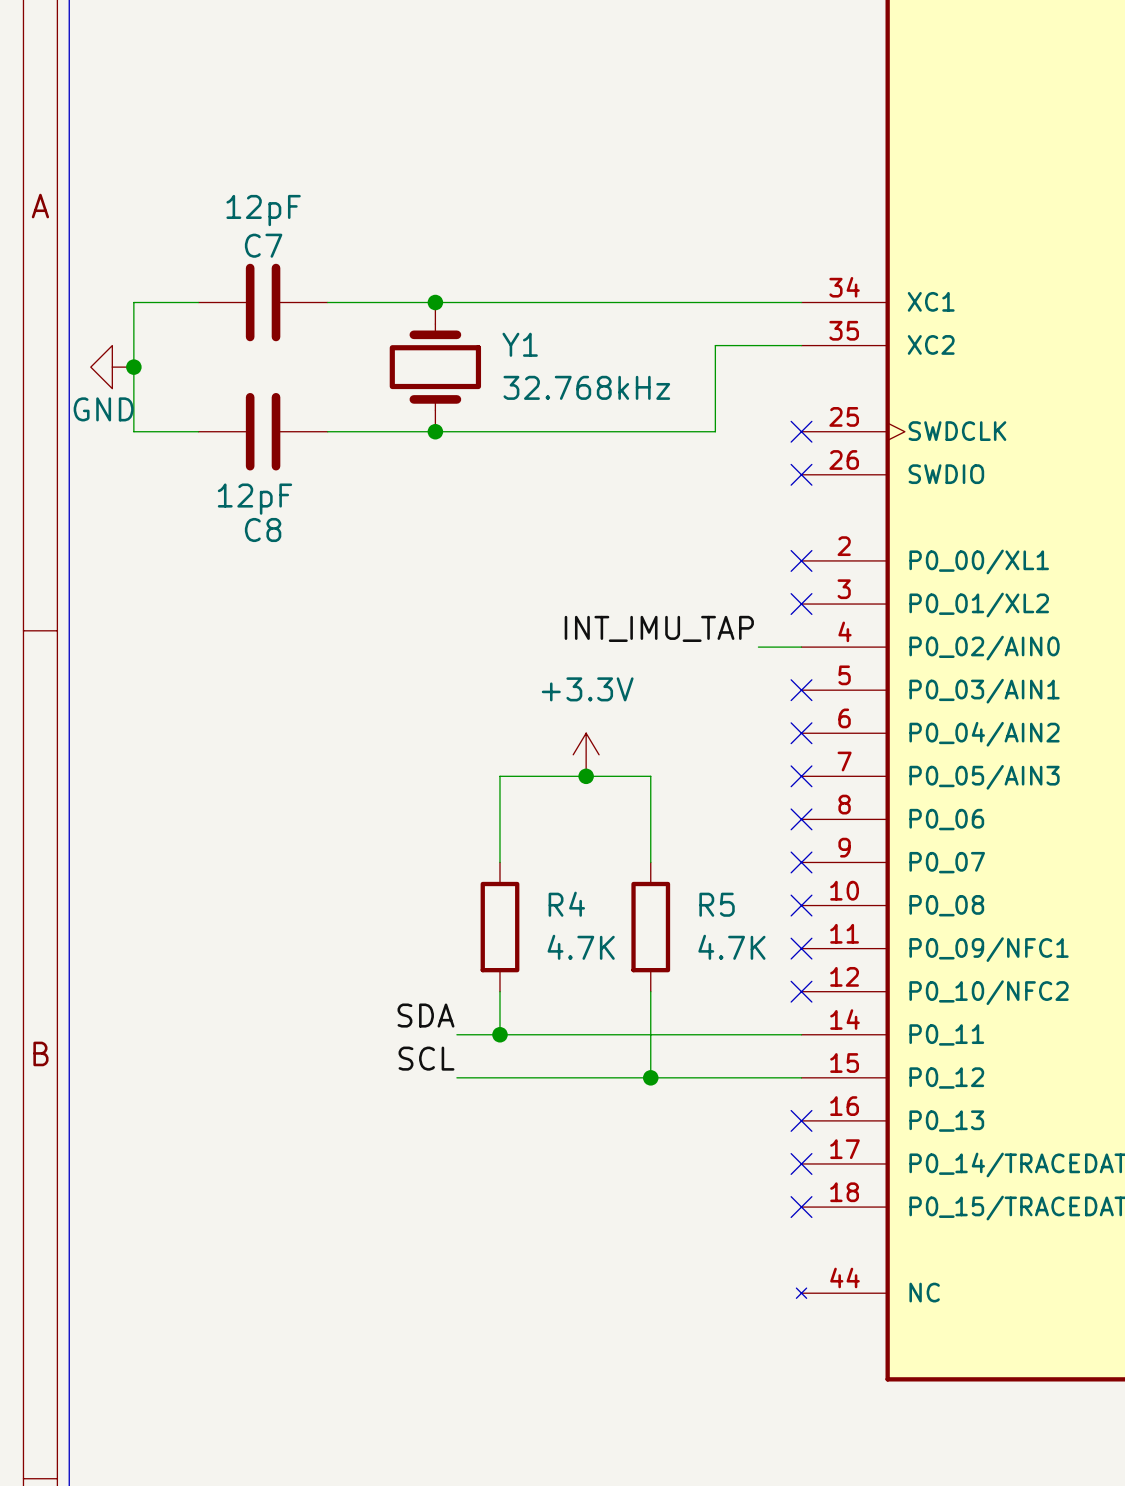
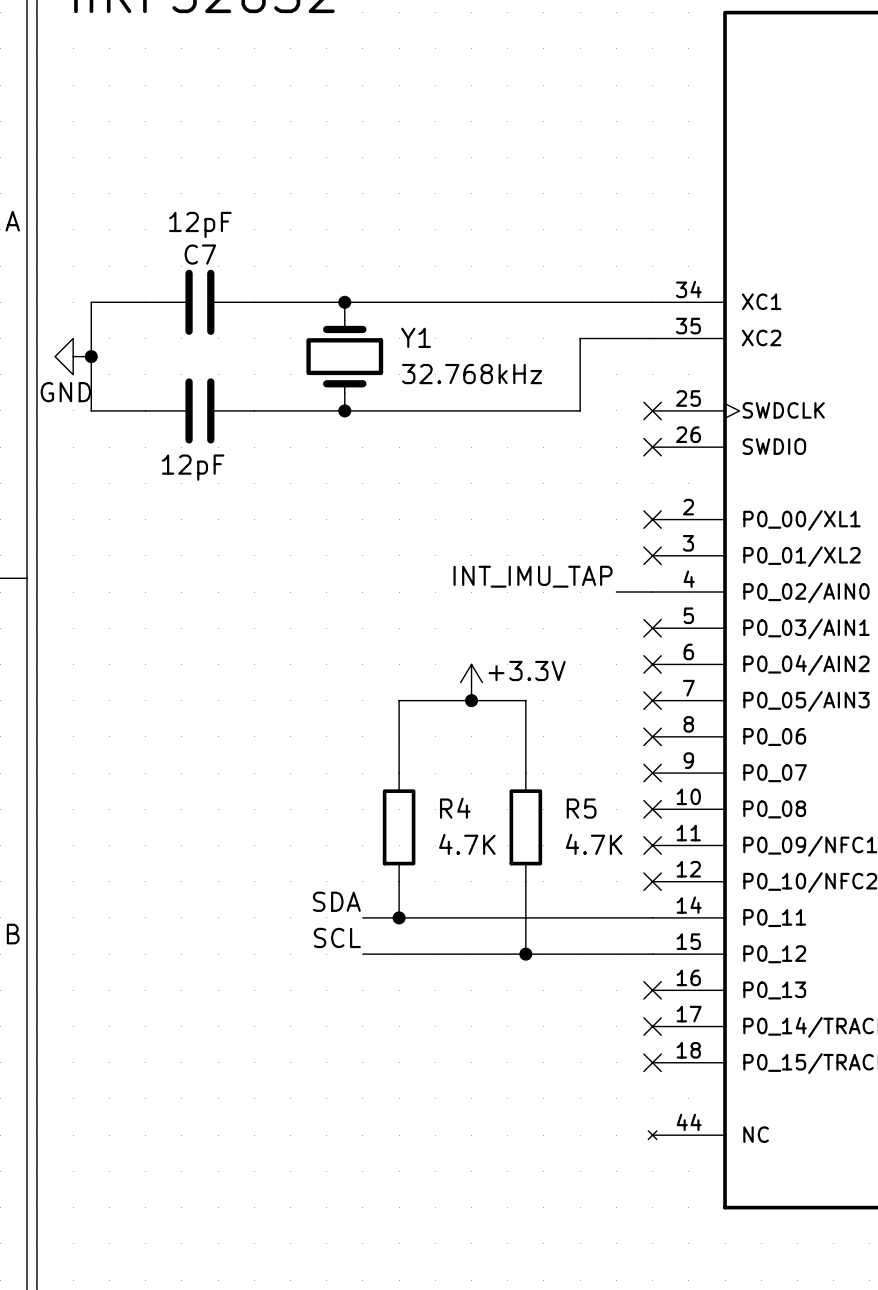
C8 name: C8 (263, 529) -> none
power symbol text position: +3.3V (587, 689) -> +3.3V (527, 670)

